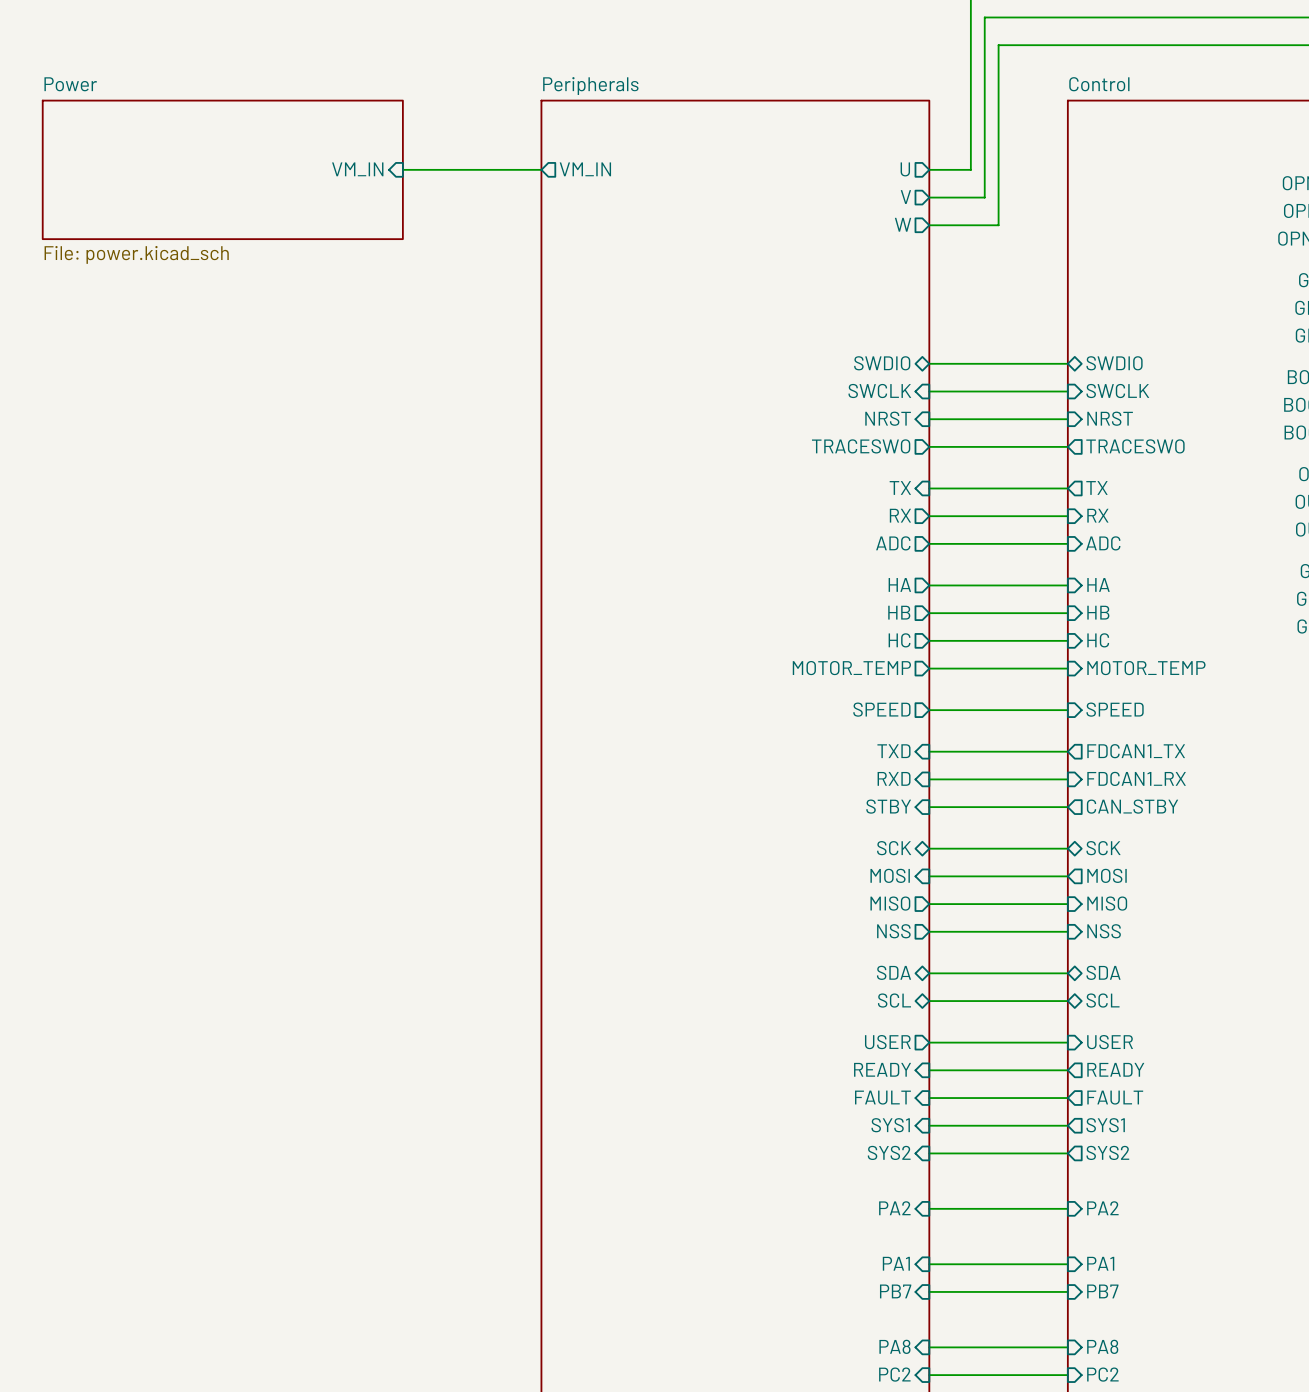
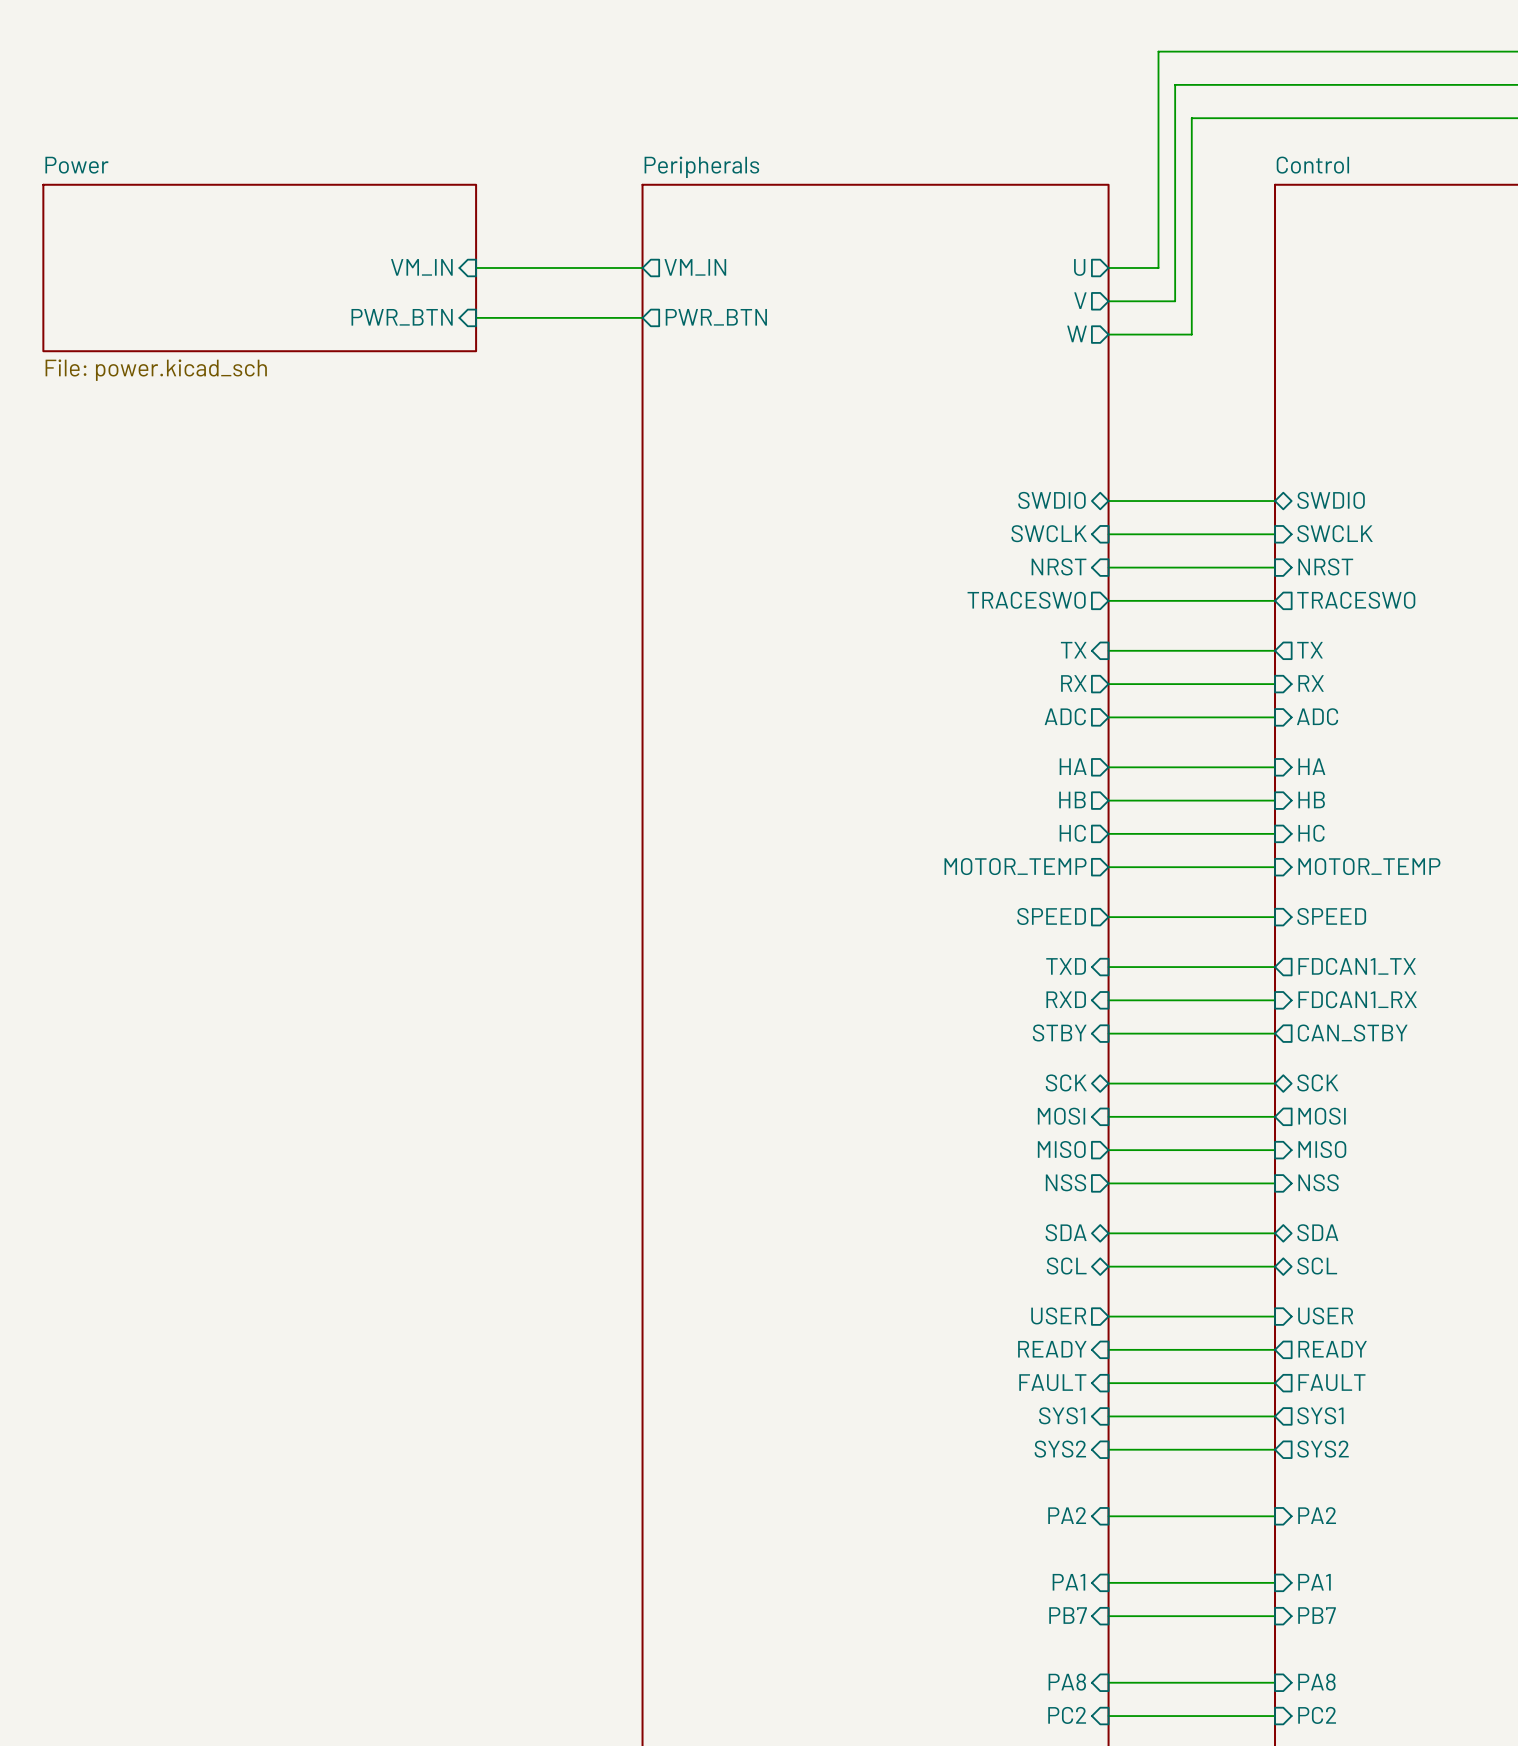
sheet pin: none -> PWR_BTN (402, 317)
sheet pin: none -> PWR_BTN (716, 317)
wire: none -> (476, 317) (642, 317)

